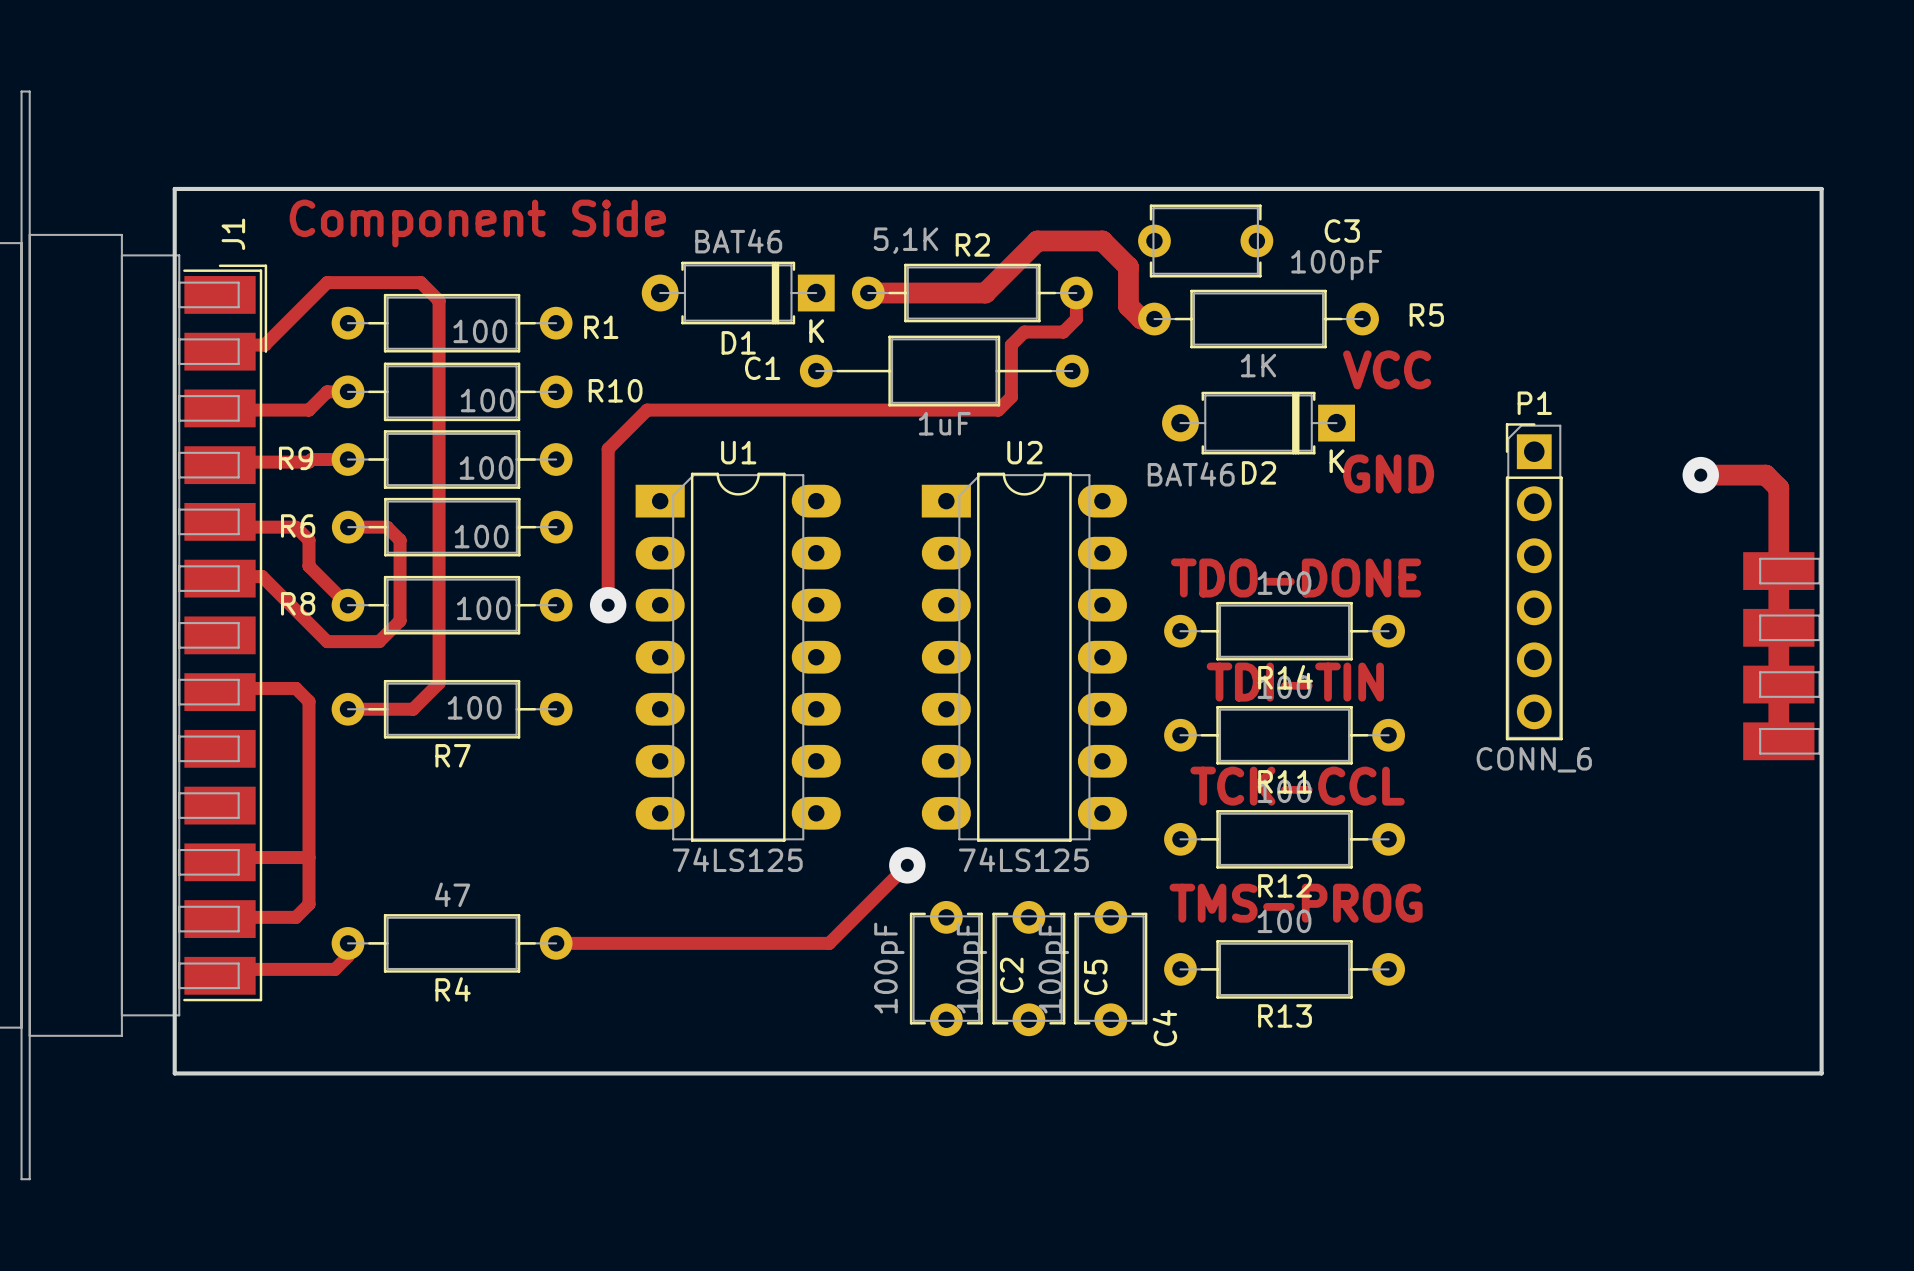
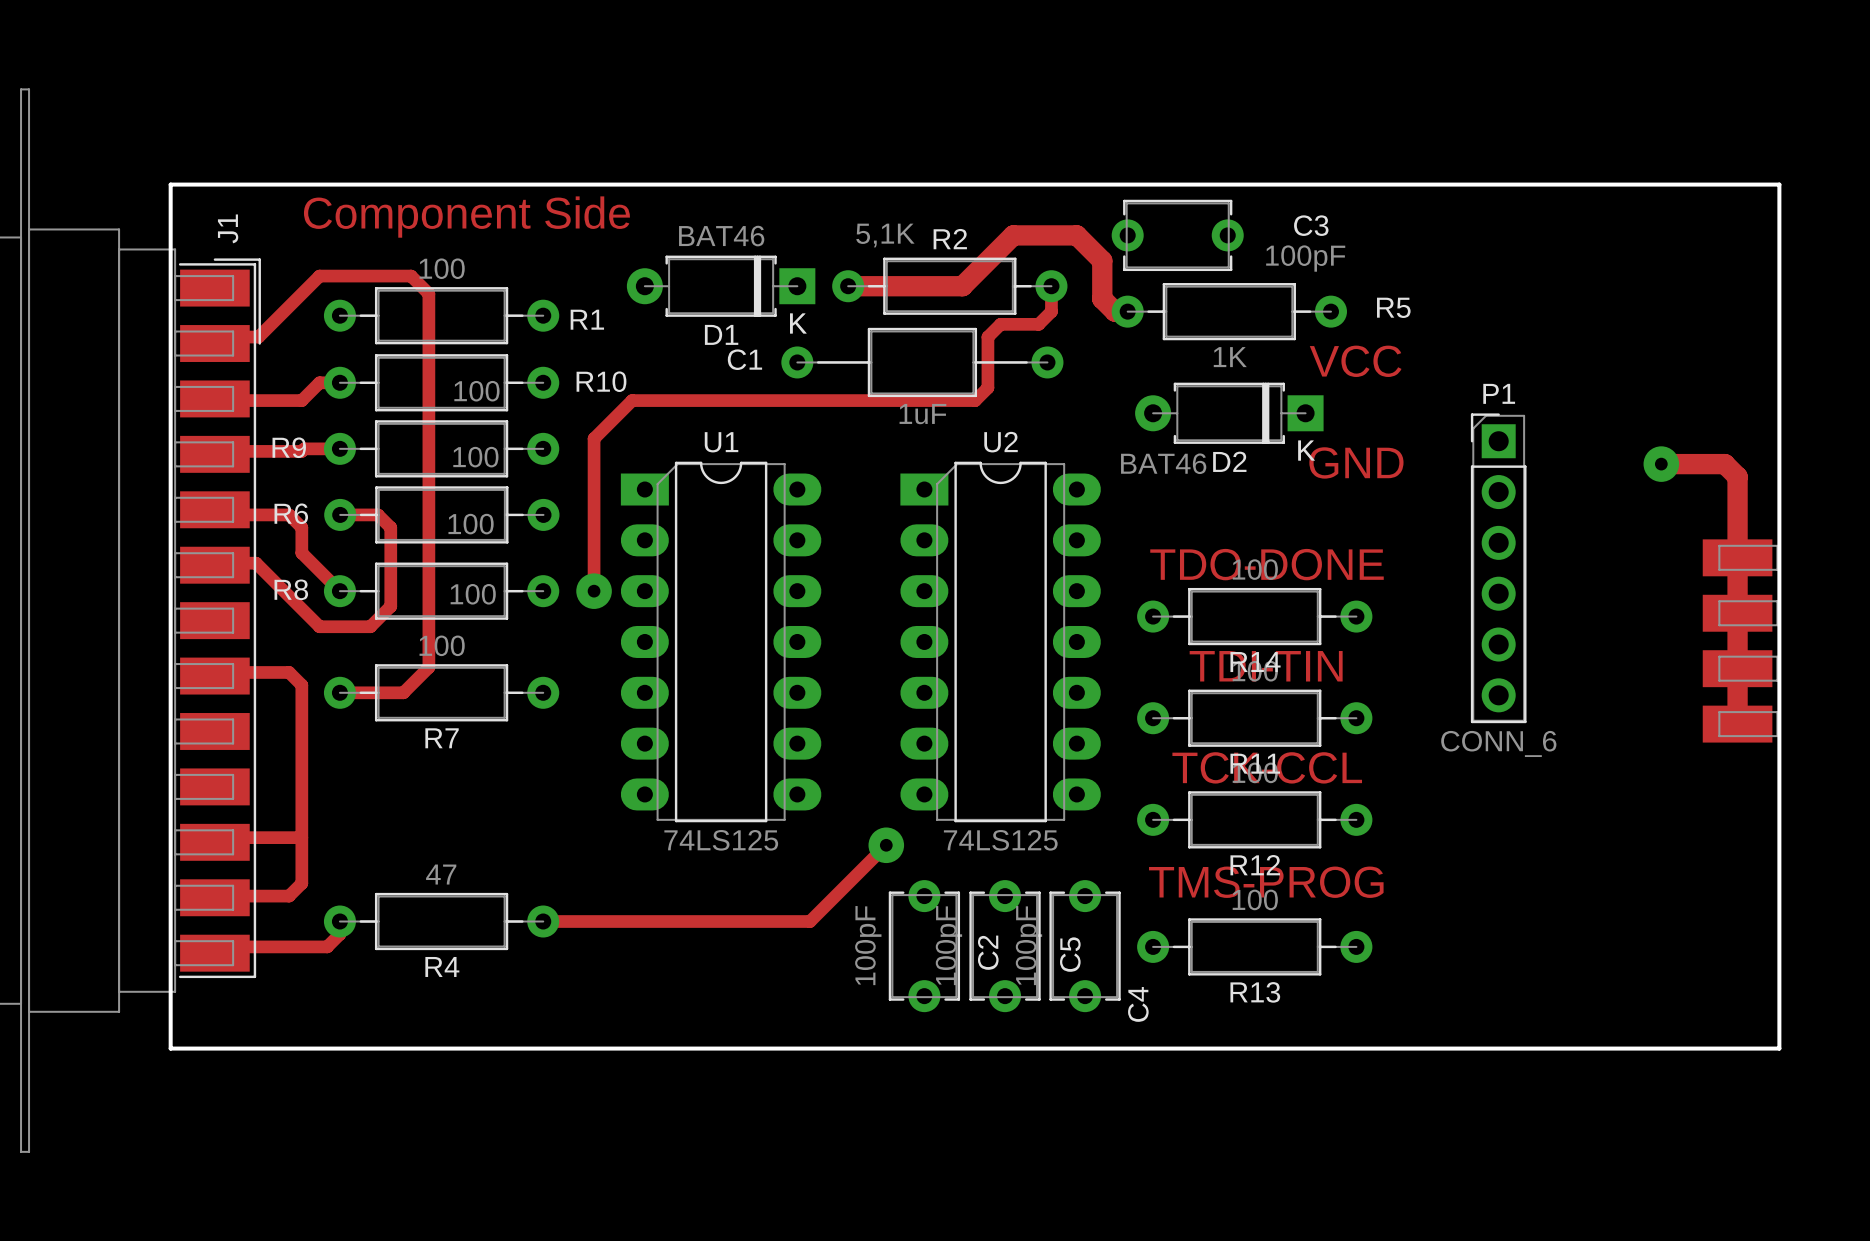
R1 value position: 100 (480, 331) -> 100 (442, 268)
R7 value position: 100 (474, 707) -> 100 (442, 645)

